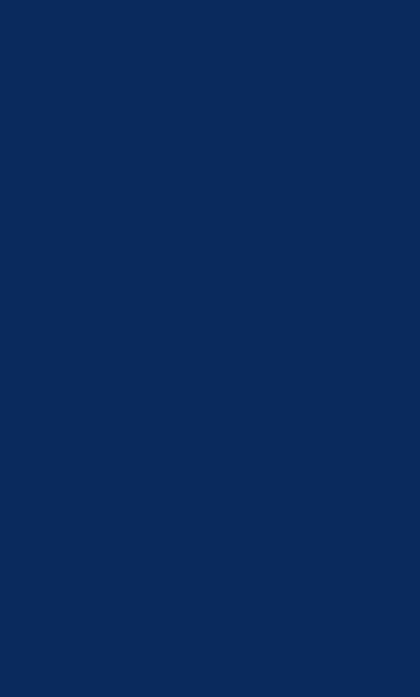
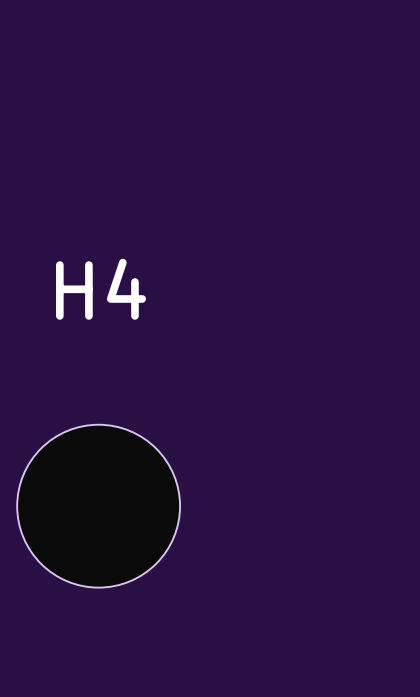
H4: none -> (98, 506)

